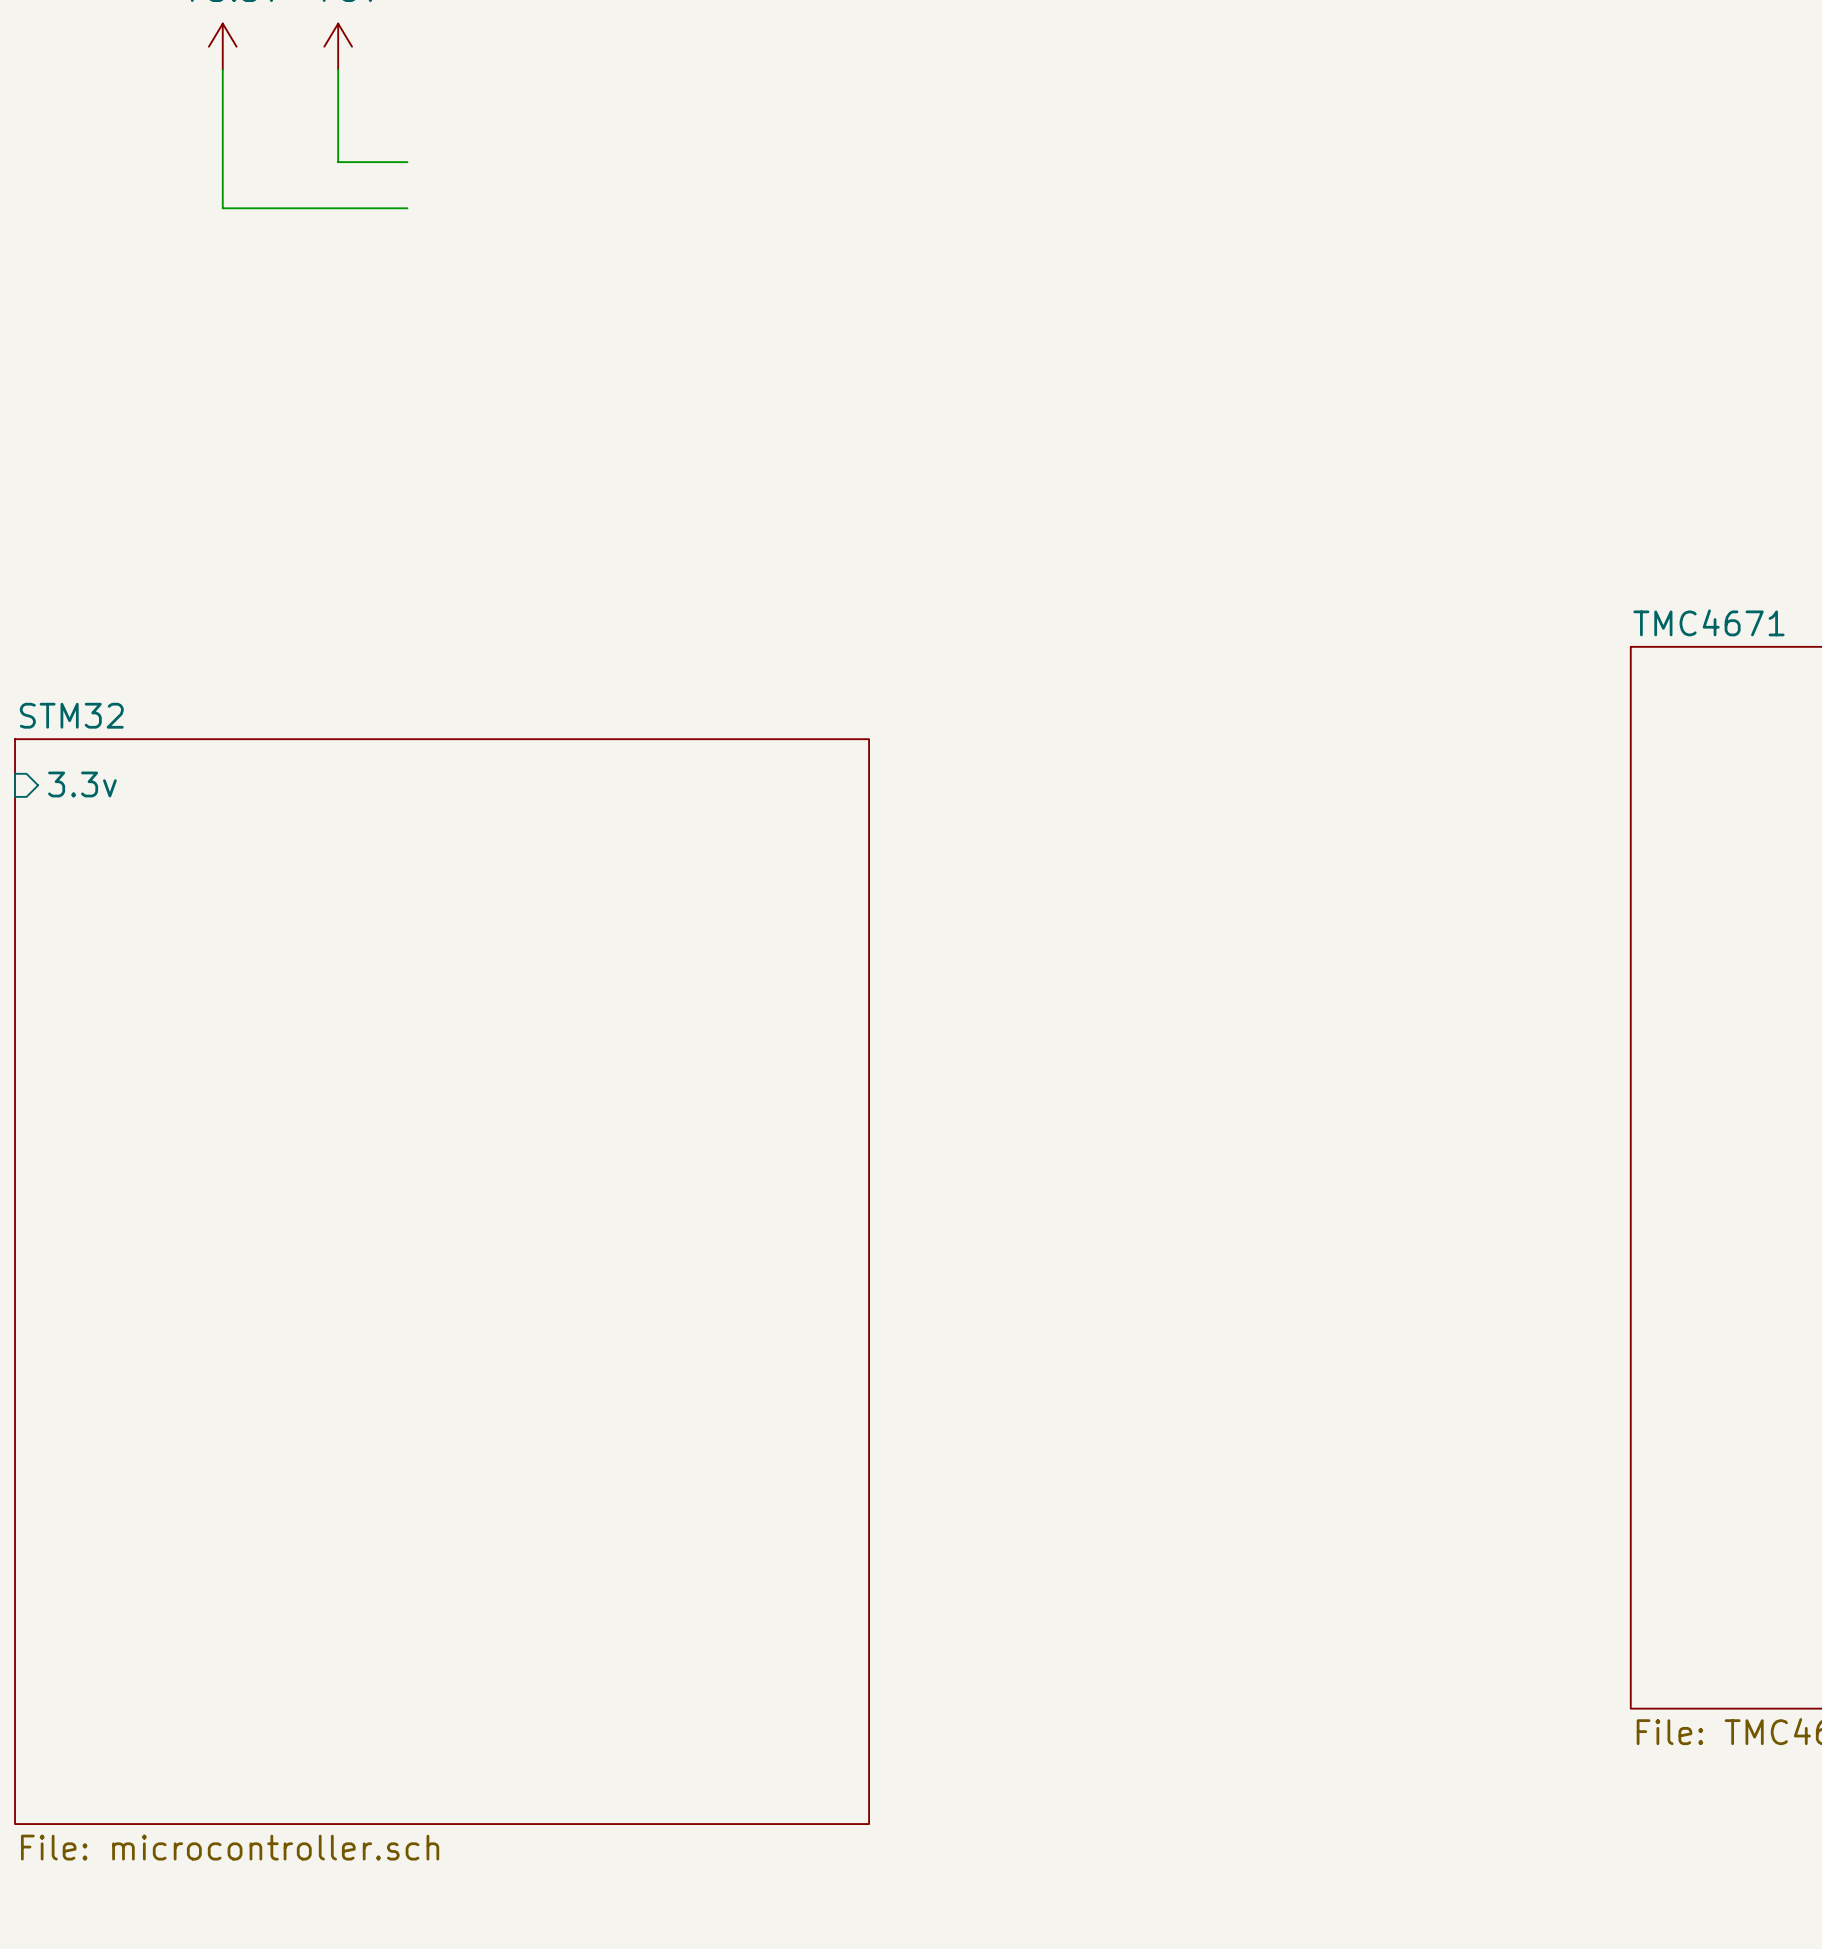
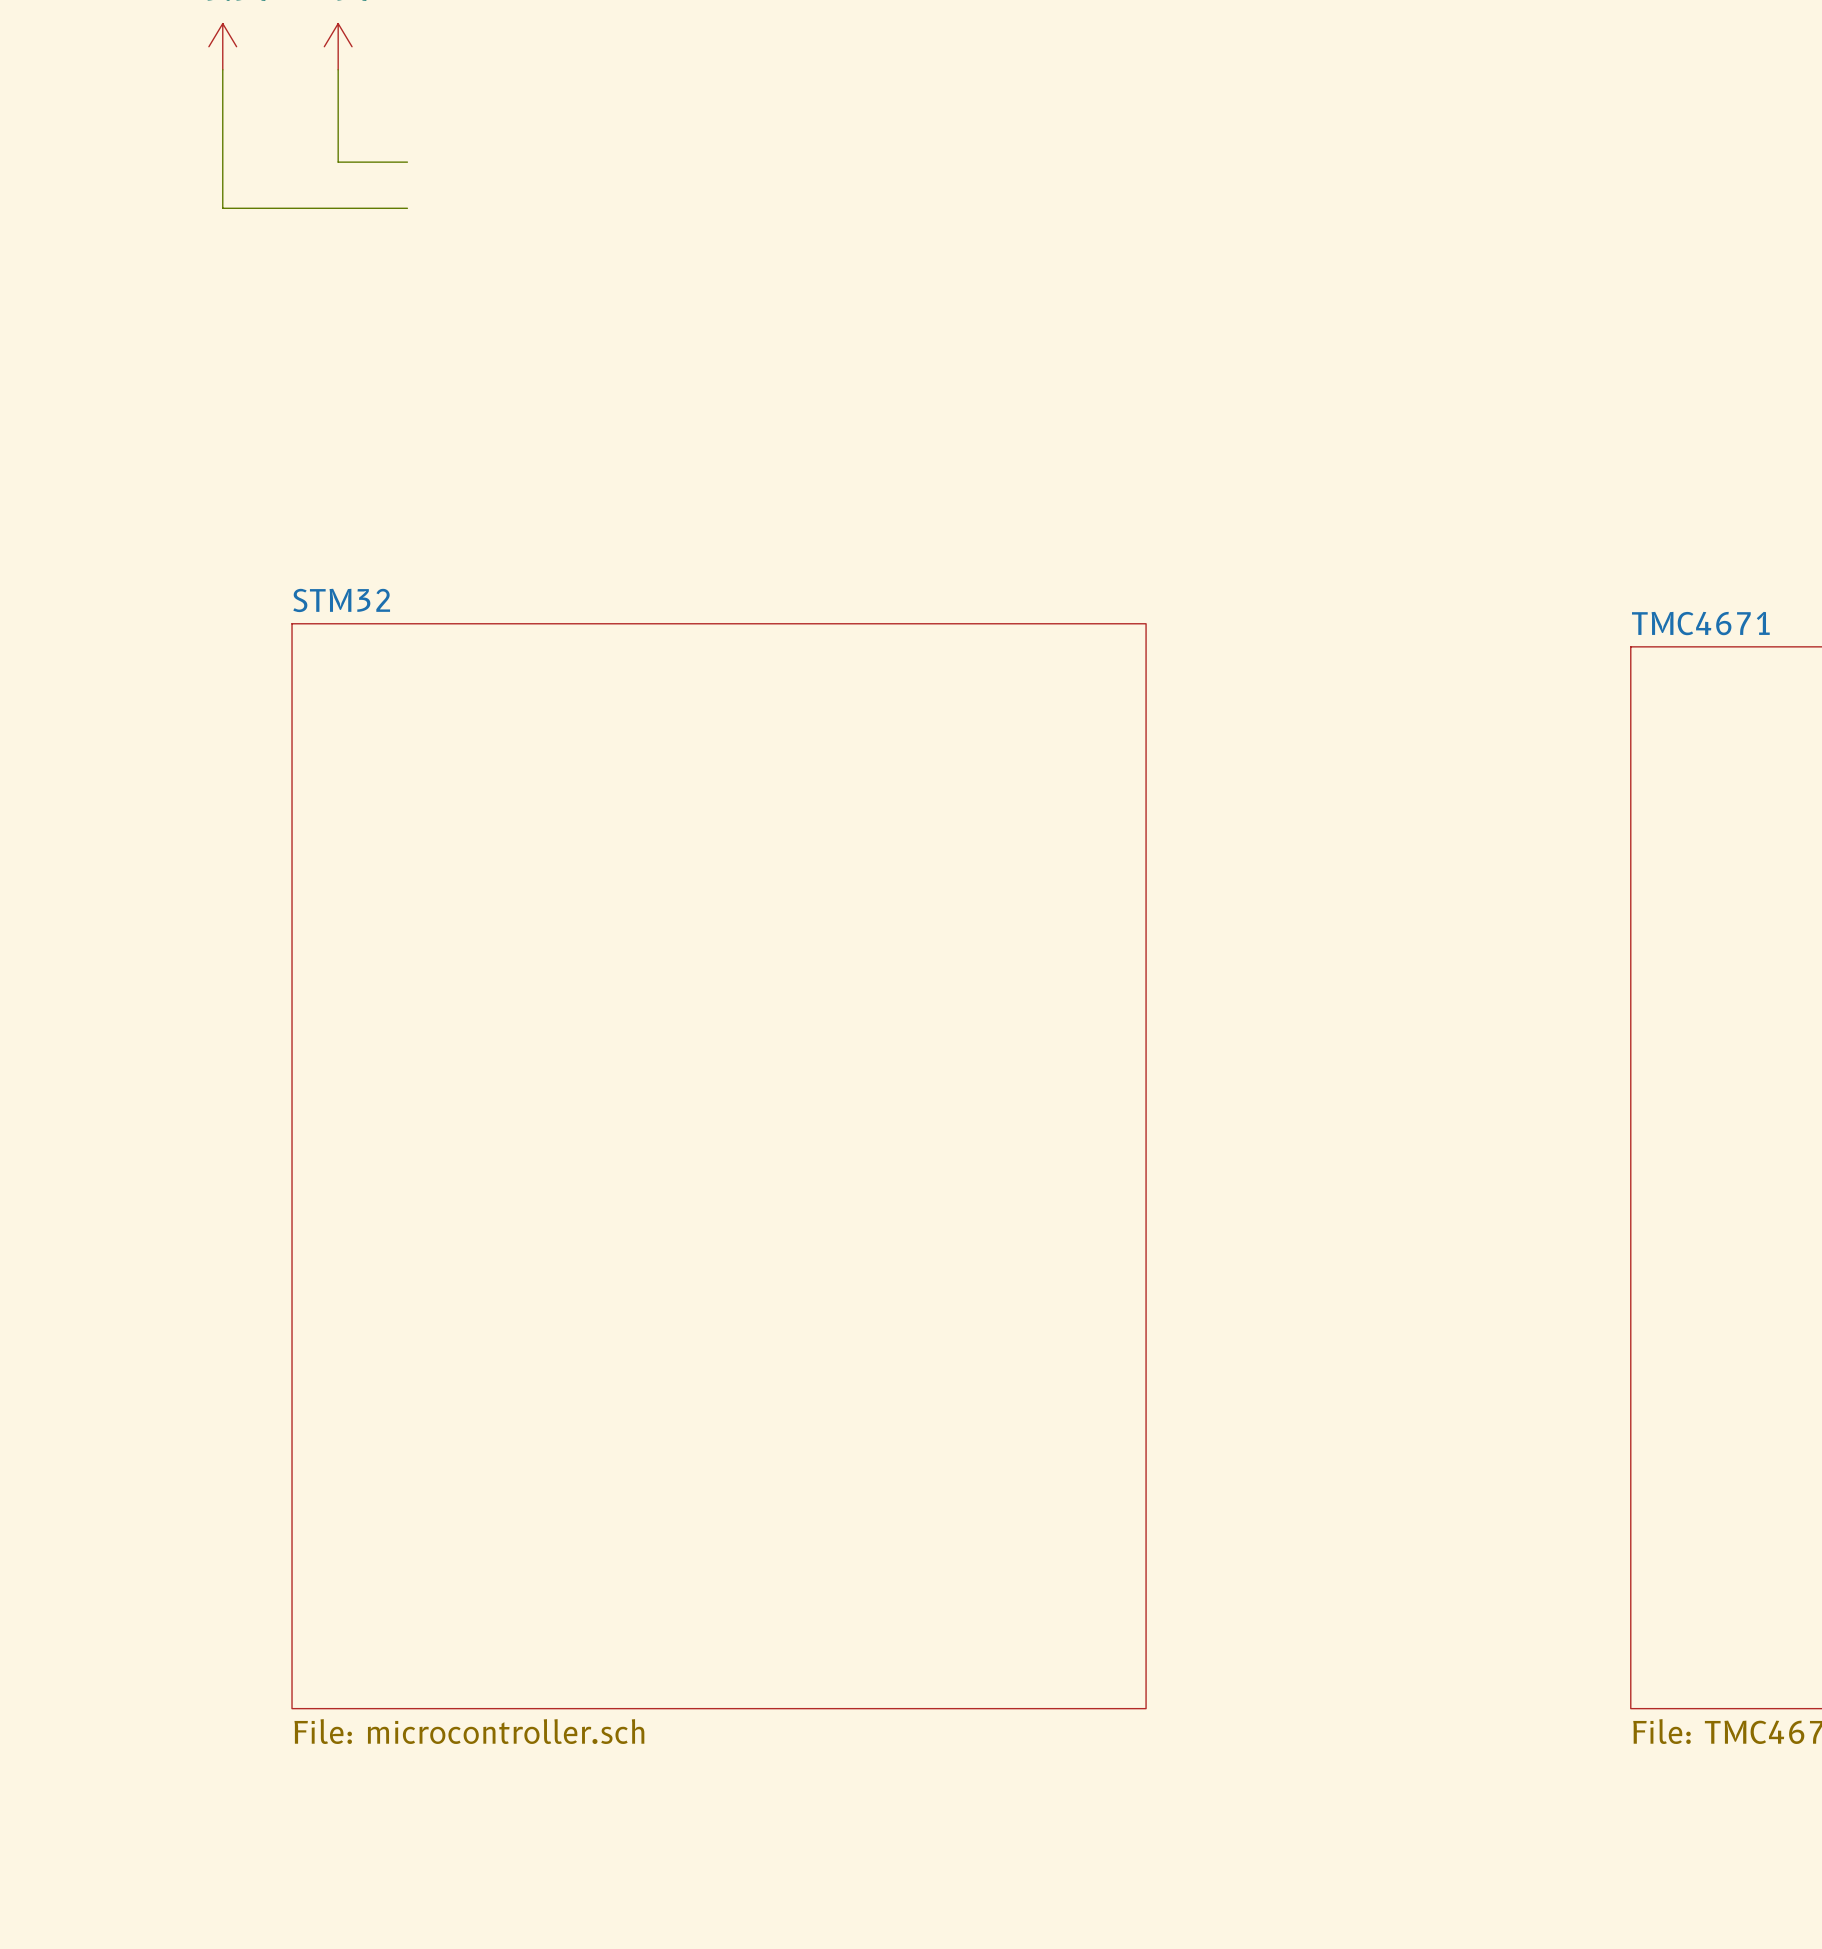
sheet pin: 3.3v (82, 784) -> none
sheet STM32 position: (442, 1281) -> (719, 1166)

